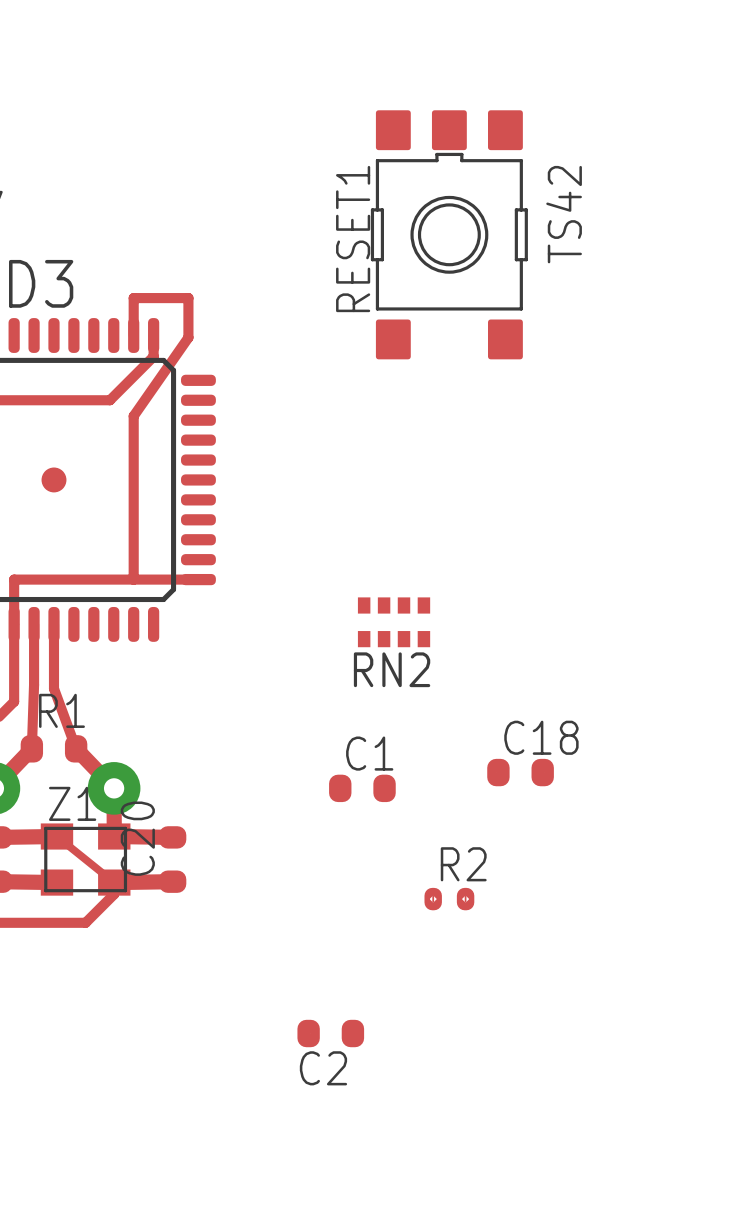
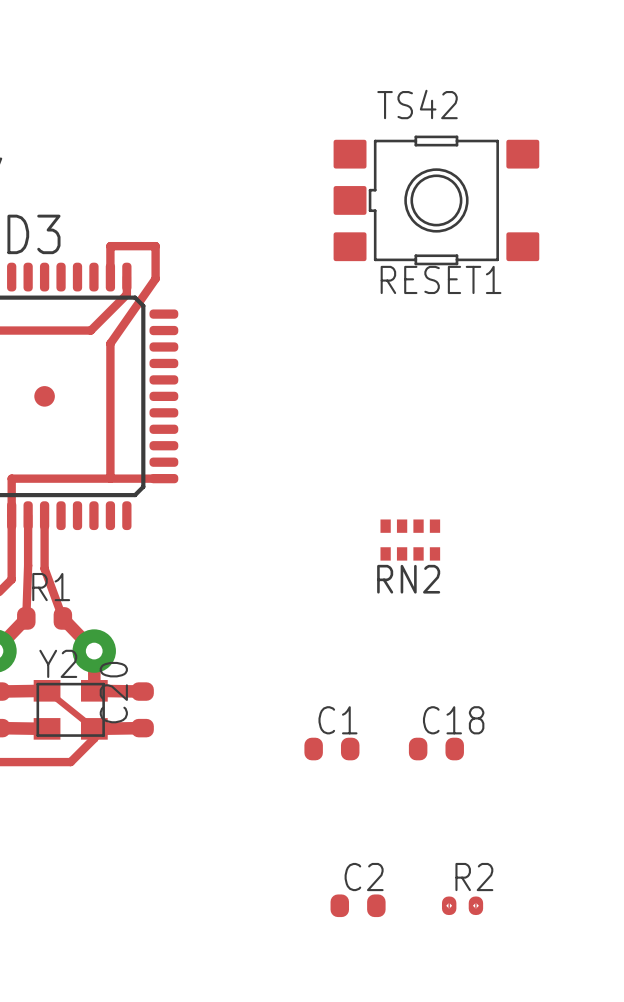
RESET1 rotation: 0° (449, 234) -> 90° counterclockwise (436, 200)
RN2 position: (394, 622) -> (410, 540)
C18 position: (520, 772) -> (436, 749)
C1 position: (362, 788) -> (331, 749)
Z1 name: Z1 (72, 803) -> Y2 (58, 663)
R2 position: (449, 899) -> (462, 905)
C2 position: (330, 1033) -> (358, 905)
C2 name position: C2 (323, 1068) -> C2 (364, 877)

